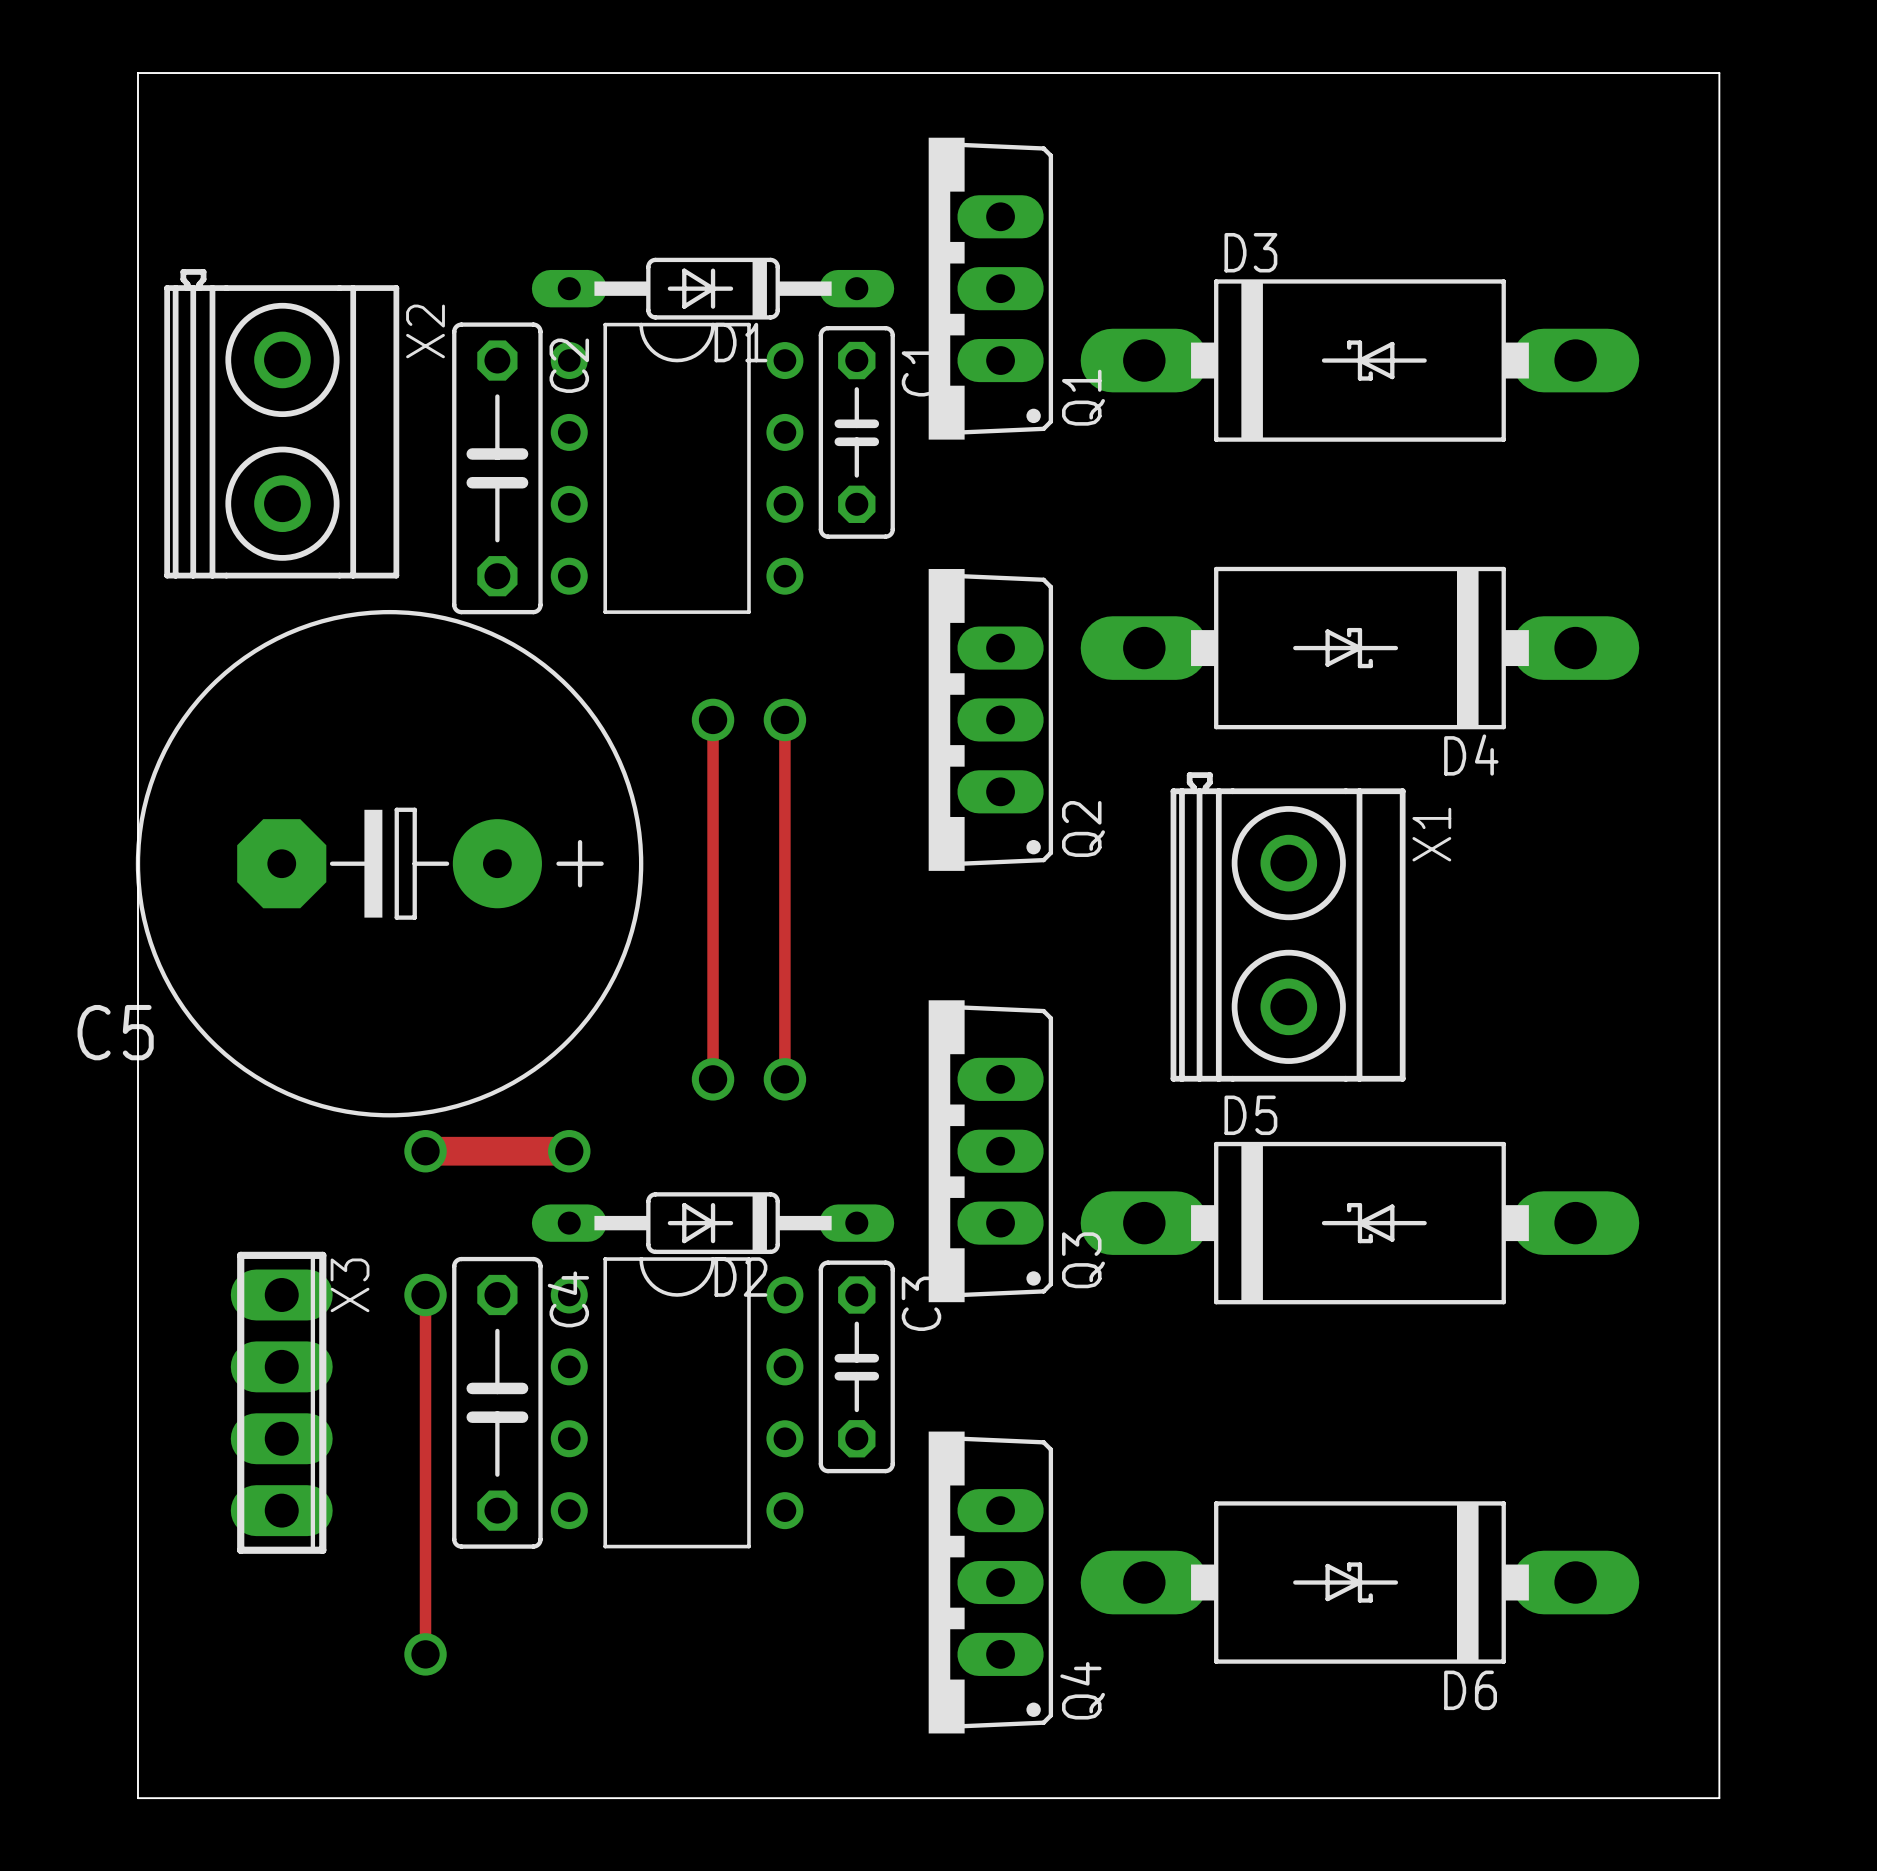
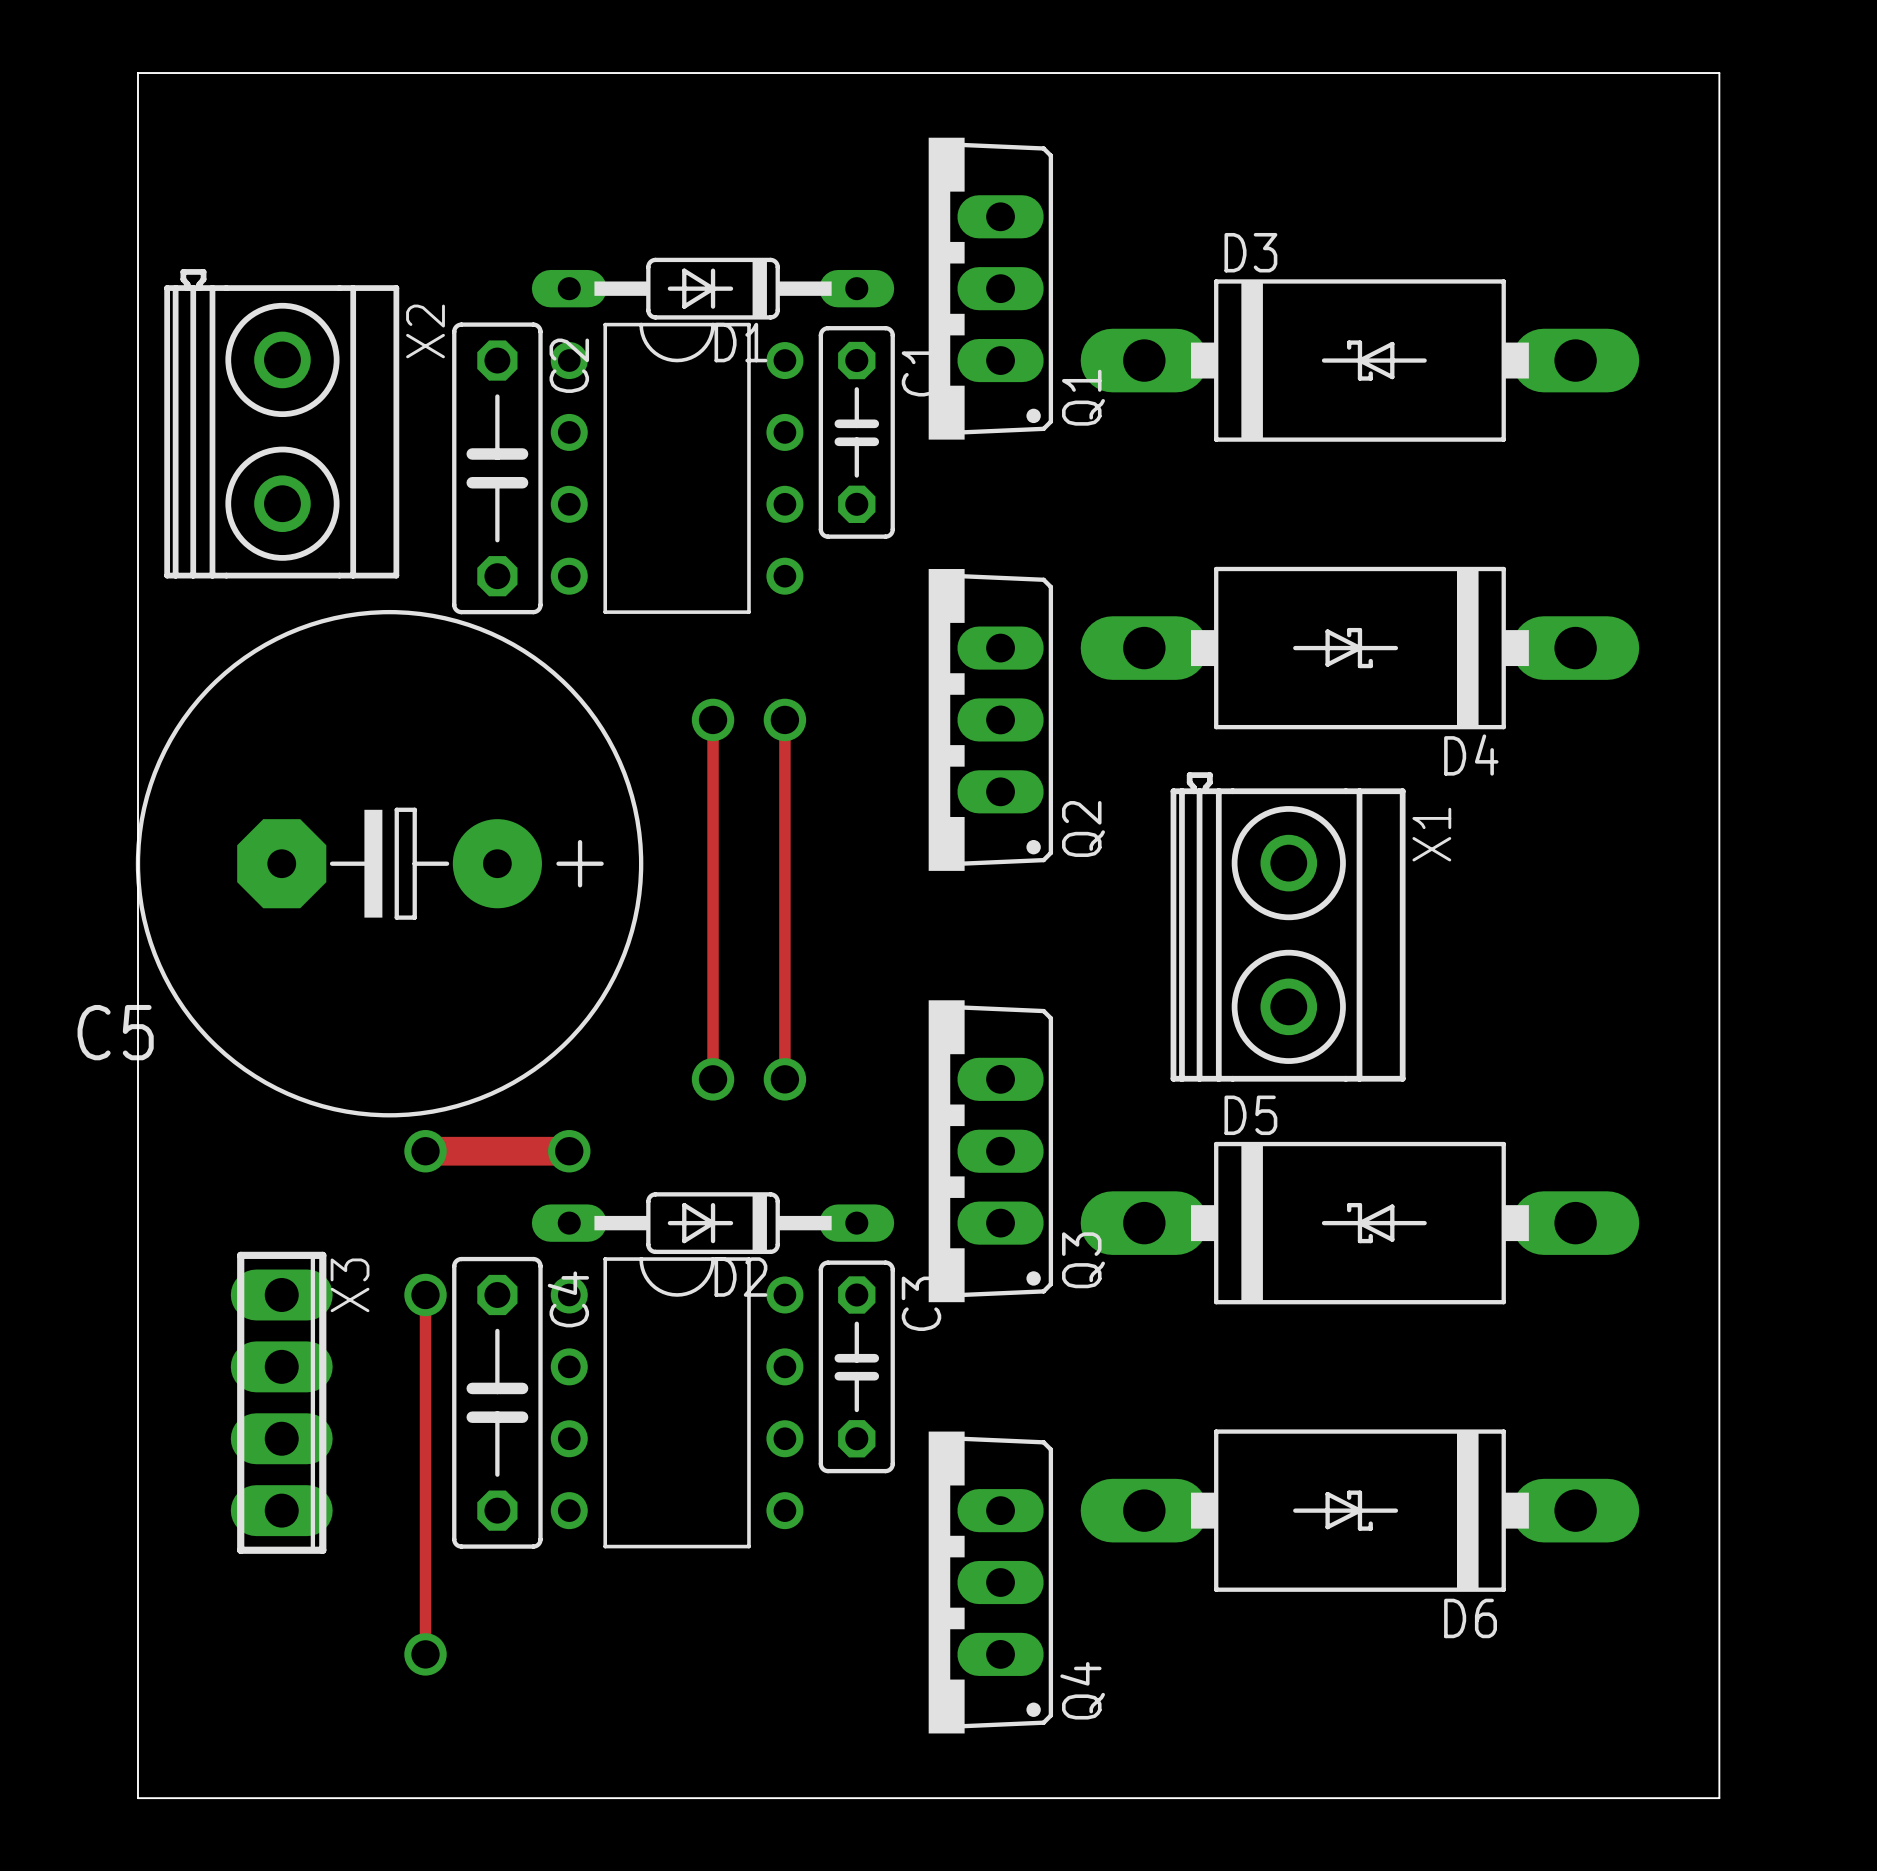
D6 position: (1359, 1582) -> (1359, 1510)

